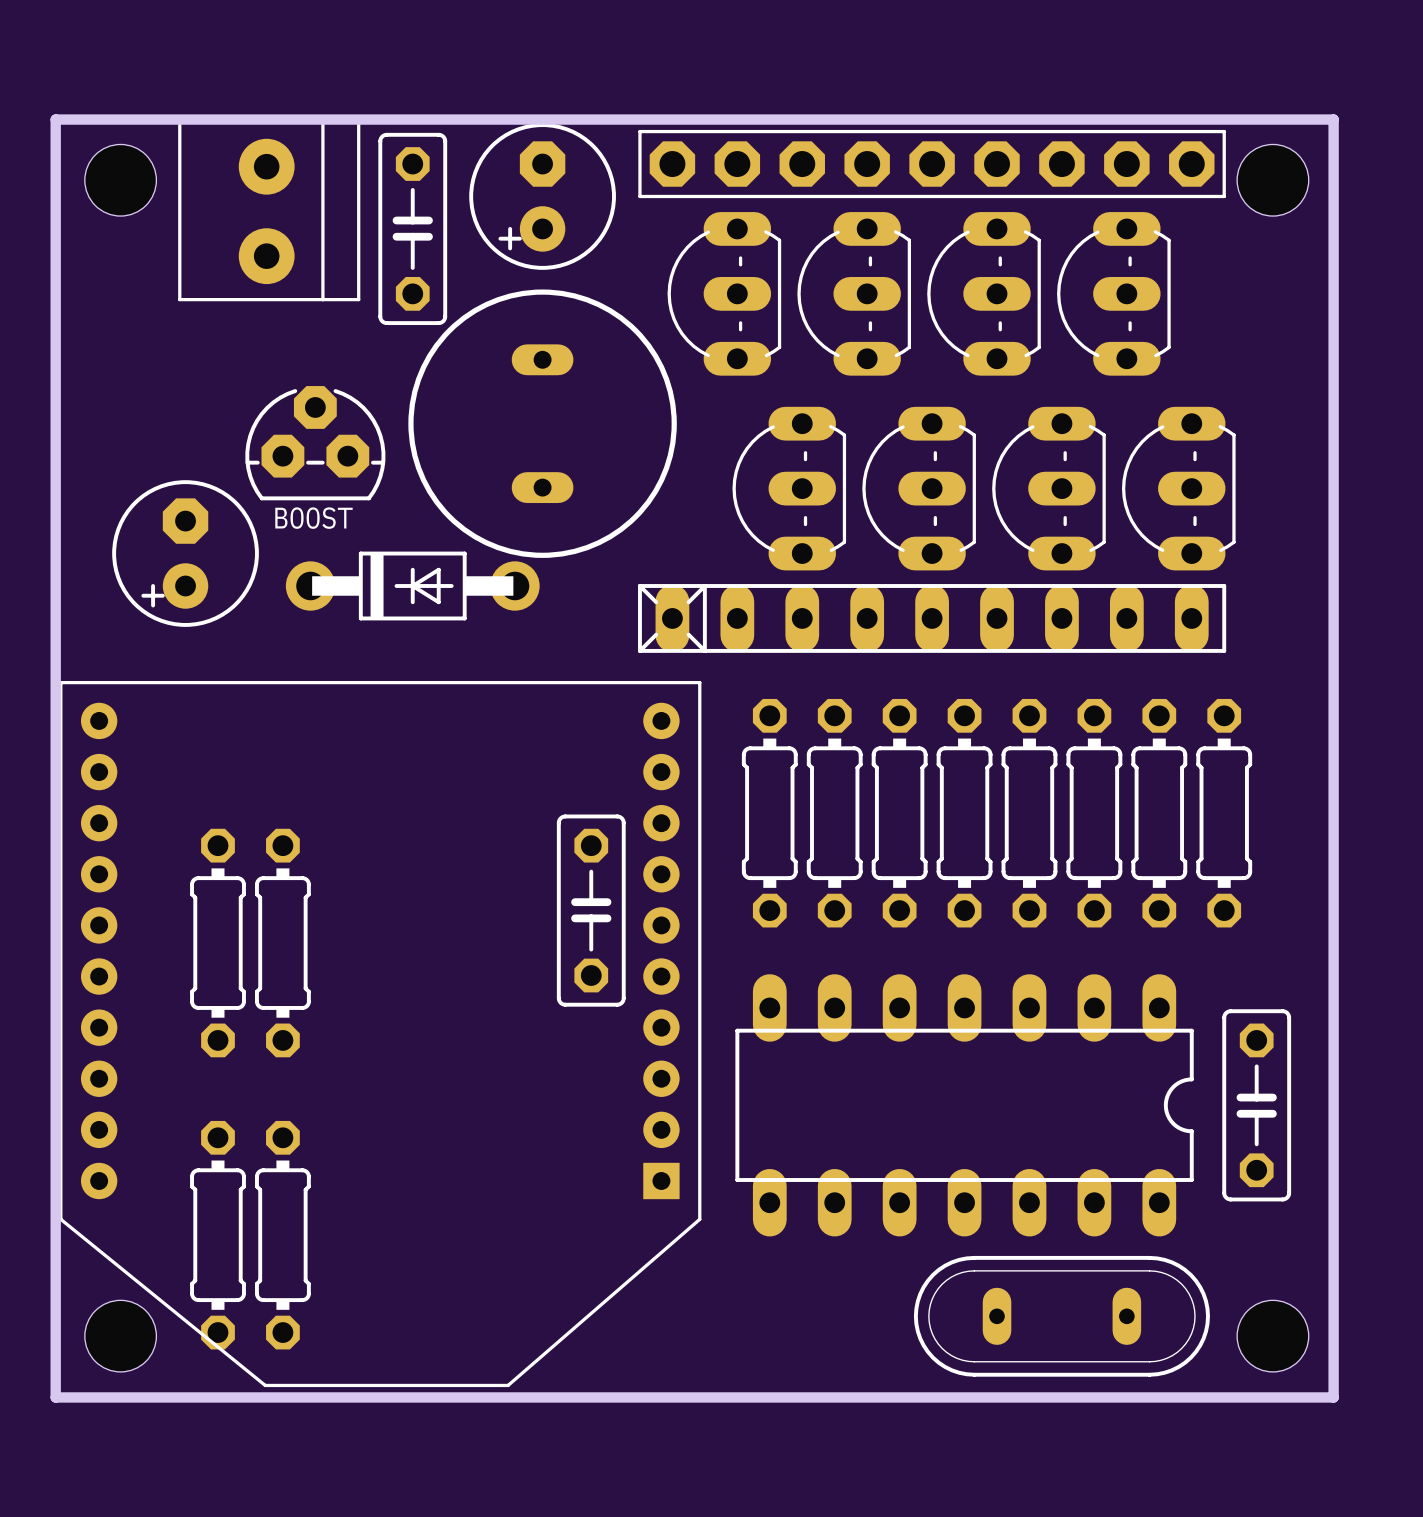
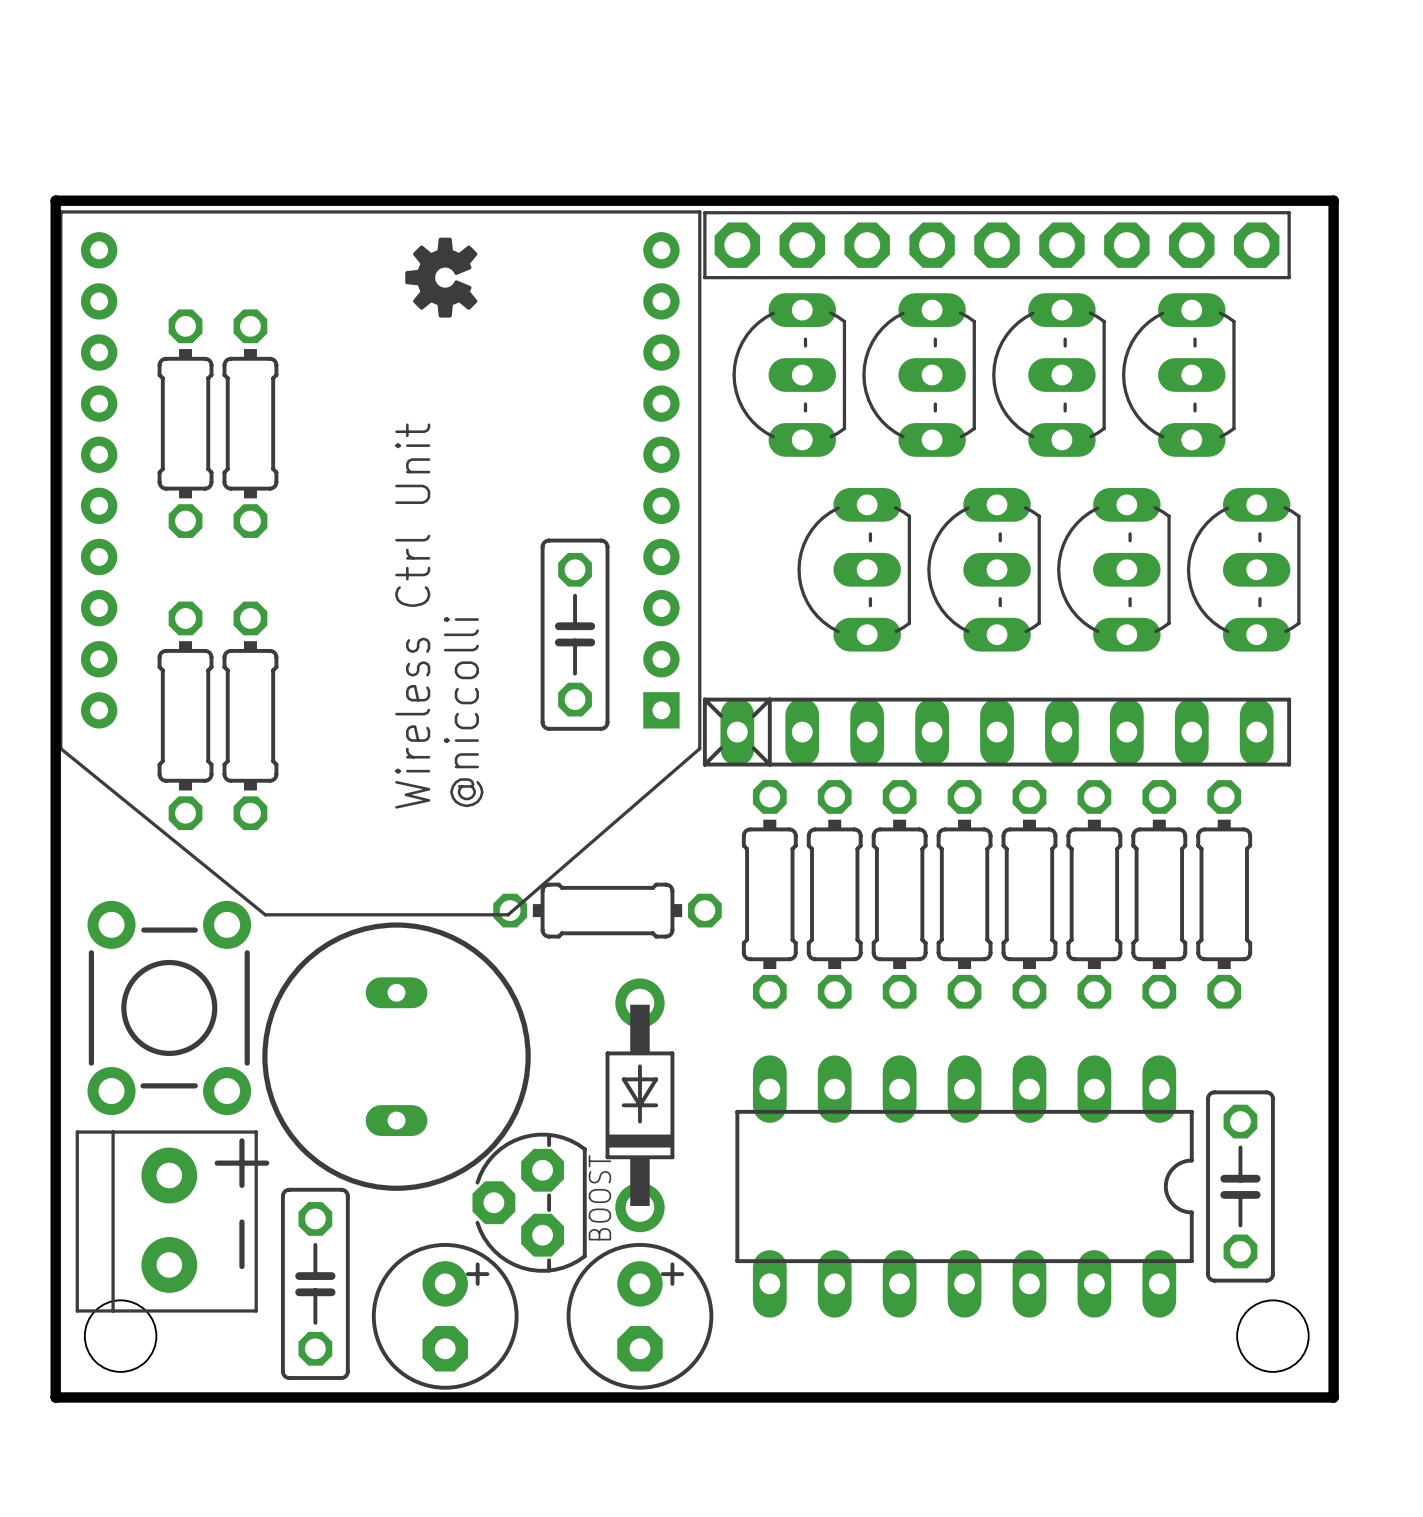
part position: (932, 164) -> (997, 245)
hole: (120, 180) -> none
hole: (1272, 180) -> none
part: (542, 196) -> none
board edge: (55, 200) (55, 119) (1333, 119) (1333, 200) -> (55, 200) (1333, 200)
part: (269, 210) -> none
part: (412, 228) -> none
drawing: none -> [405, 237, 478, 318]
part: (724, 293) -> none
part: (854, 293) -> none
part: (984, 293) -> none
part: (1113, 293) -> none
part: none -> (789, 375)
part: none -> (919, 375)
part: none -> (1048, 375)
part: none -> (1178, 375)
part: none -> (185, 423)
part: none -> (250, 423)
part: (542, 423) -> none
part: (315, 443) -> none
part: (789, 488) -> none
part: (919, 488) -> none
part: (1048, 488) -> none
part: (1178, 488) -> none
text: BOOST (313, 518) -> none
part: (185, 553) -> none
part: none -> (854, 569)
part: none -> (984, 569)
part: none -> (1113, 569)
part: none -> (1243, 569)
part rotation: 0° (412, 585) -> 90° counterclockwise (639, 1105)
part position: (412, 585) -> (639, 1105)
text: none -> Wireless Ctrl Unit (412, 616)
part position: (932, 618) -> (997, 732)
part: none -> (575, 634)
text: none -> @niccolli (463, 712)
part: none -> (185, 715)
part: none -> (250, 715)
part: (769, 813) -> none
part: (834, 813) -> none
part: (899, 813) -> none
part: (964, 813) -> none
part: (1029, 813) -> none
part: (1094, 813) -> none
part: (1159, 813) -> none
part: (1224, 813) -> none
part footprint: [556, 814, 626, 1007] -> [493, 882, 722, 939]
part: none -> (769, 894)
part: none -> (834, 894)
part: none -> (899, 894)
part: none -> (964, 894)
part: none -> (1029, 894)
part: none -> (1094, 894)
part: none -> (1159, 894)
part: none -> (1224, 894)
part: (217, 943) -> none
part: (282, 943) -> none
part: none -> (169, 1007)
part position: (380, 1034) -> (380, 563)
part: none -> (396, 1056)
part position: (964, 1105) -> (964, 1186)
part position: (1256, 1105) -> (1240, 1186)
text: none -> + (241, 1163)
part: none -> (529, 1202)
text: none -> BOOST (599, 1197)
part: none -> (166, 1221)
part: (217, 1235) -> none
part: (282, 1235) -> none
text: none -> - (241, 1244)
part: none -> (315, 1283)
part: none -> (445, 1316)
part: none -> (639, 1316)
part: (1061, 1316) -> none

